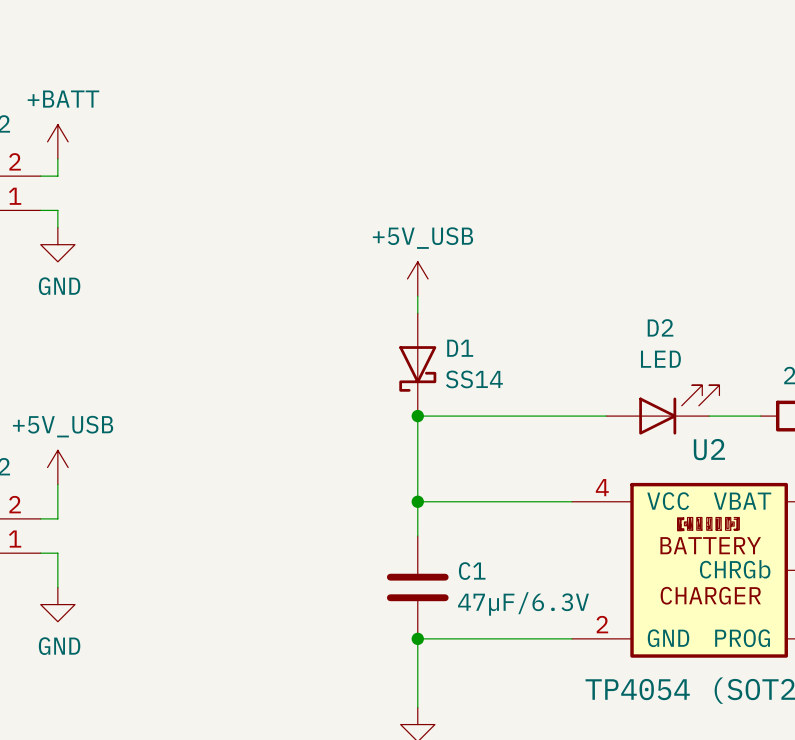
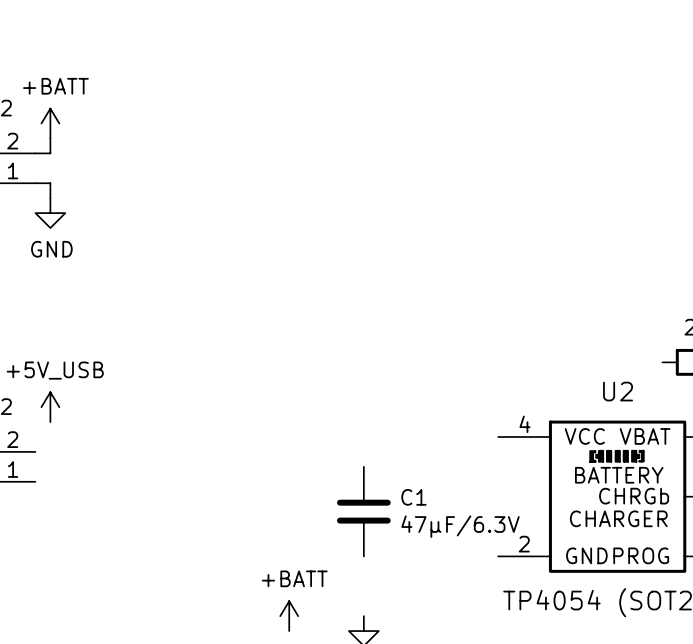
power symbol: +5V_USB (417, 278) -> none
wire: (417, 296) (417, 313) -> none
D1: SS14 (417, 364) -> none
D2: LED (662, 409) -> none
junction: (417, 416) -> none
wire: (606, 416) (417, 416) (417, 536) -> none
wire: (709, 416) (760, 416) -> none
wire: (57, 484) (57, 518) (40, 518) -> none
wire: (417, 501) (572, 501) -> none
junction: (417, 501) -> none
wire: (40, 553) (57, 553) (57, 587) -> none
power symbol: GND (57, 604) -> none
junction: (417, 638) -> none
wire: (572, 638) (417, 638) (417, 707) -> none
power symbol: none -> +BATT (289, 616)

